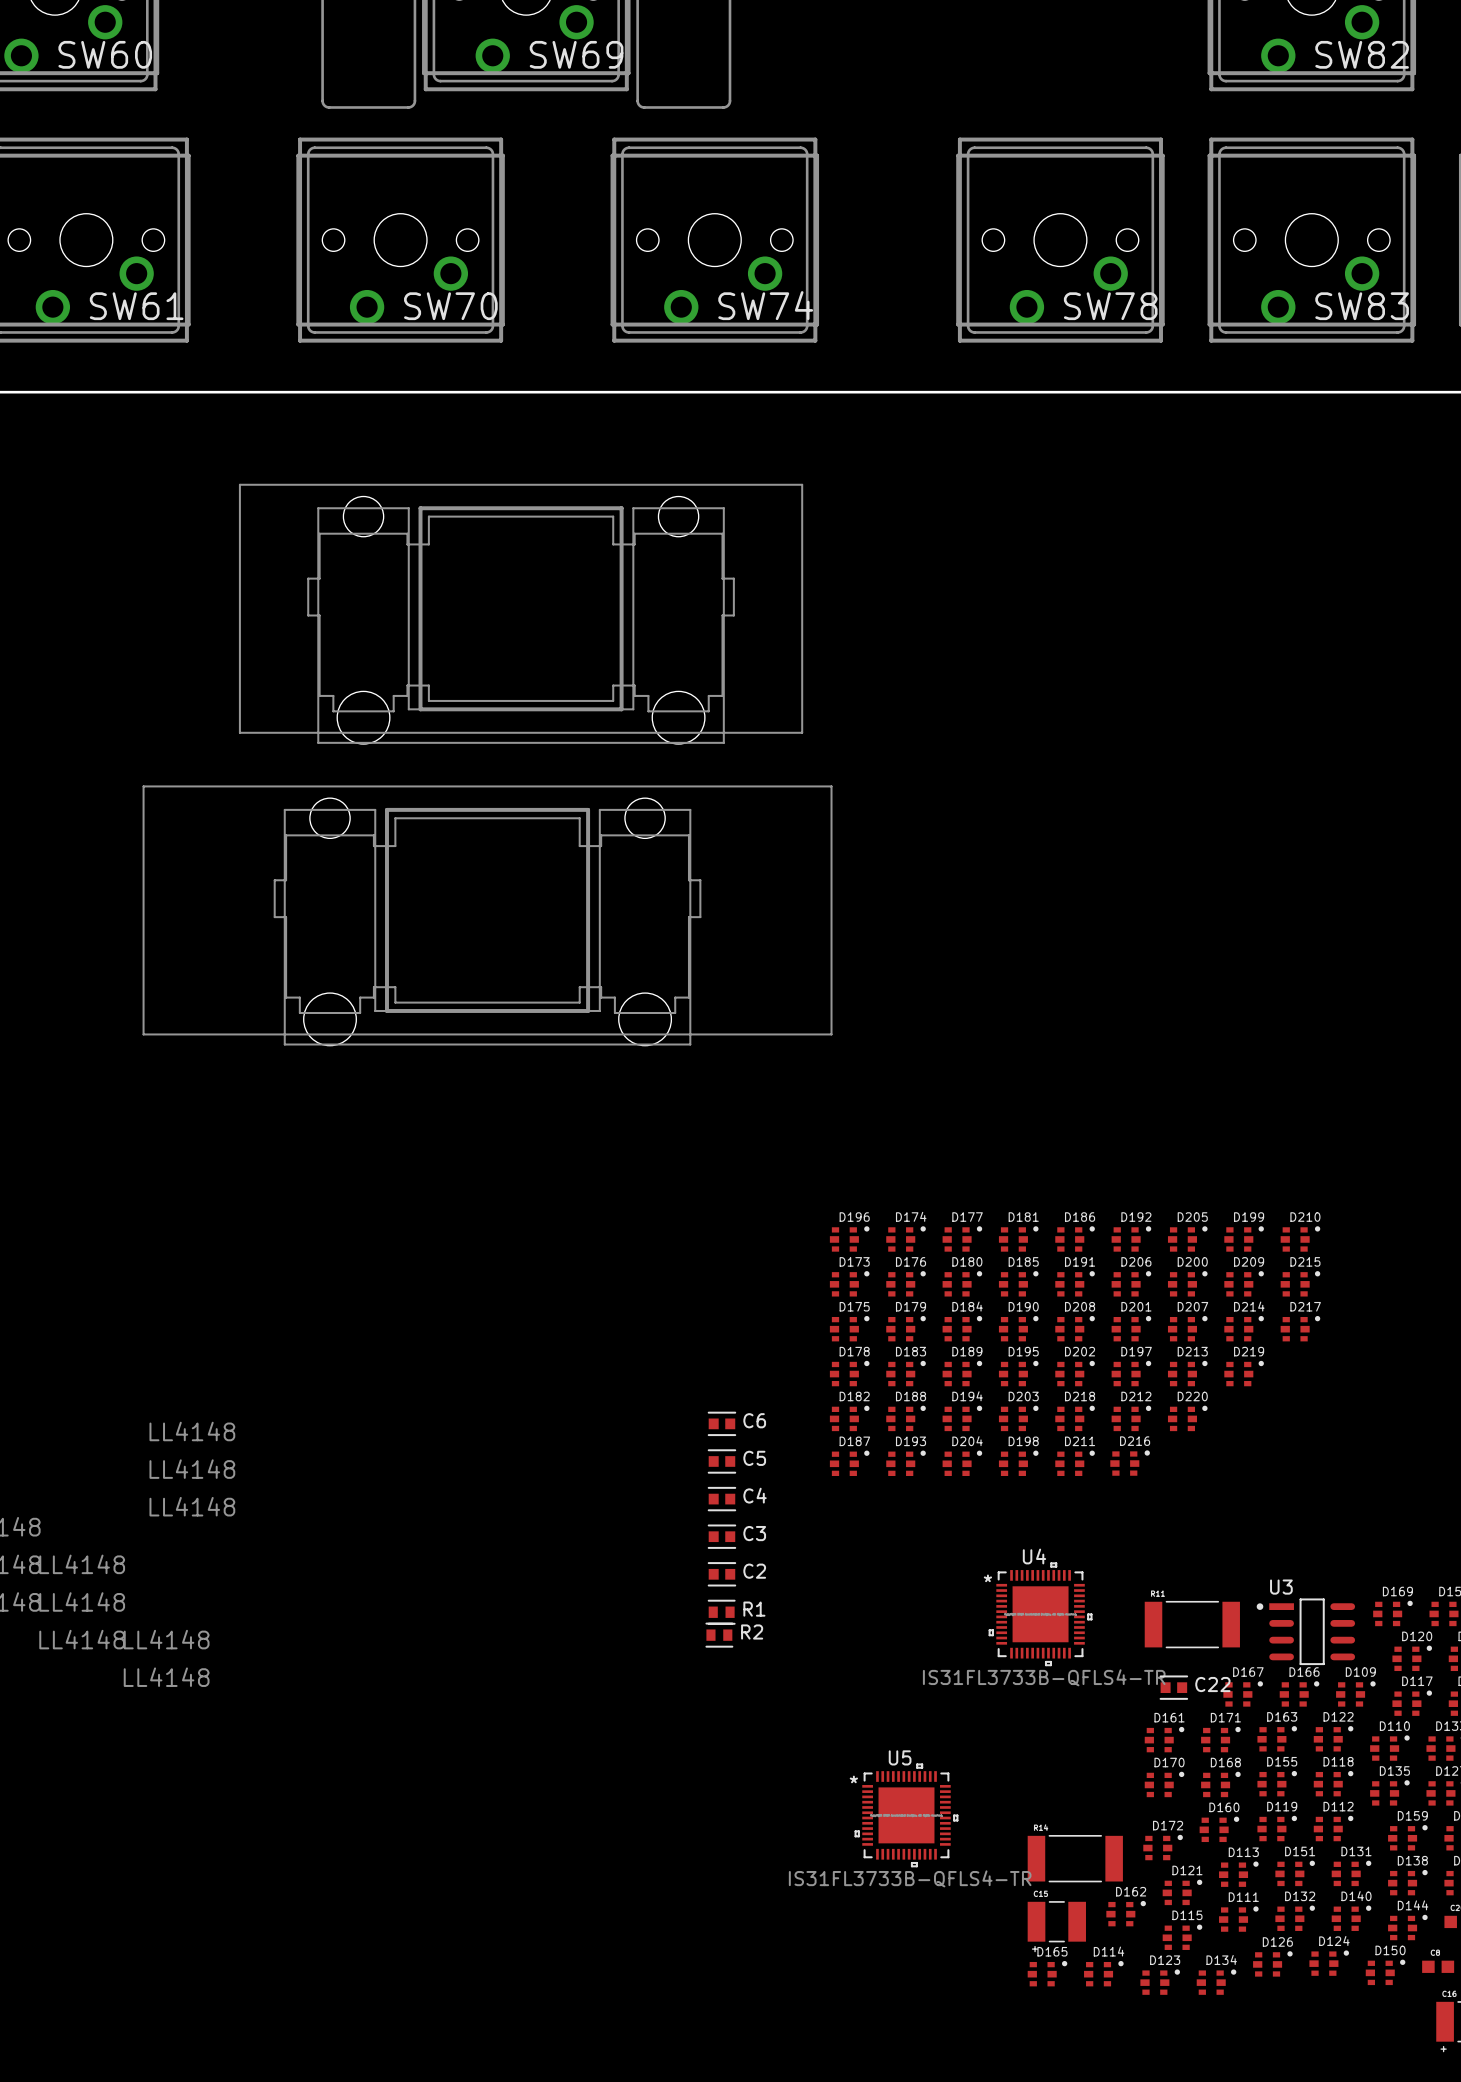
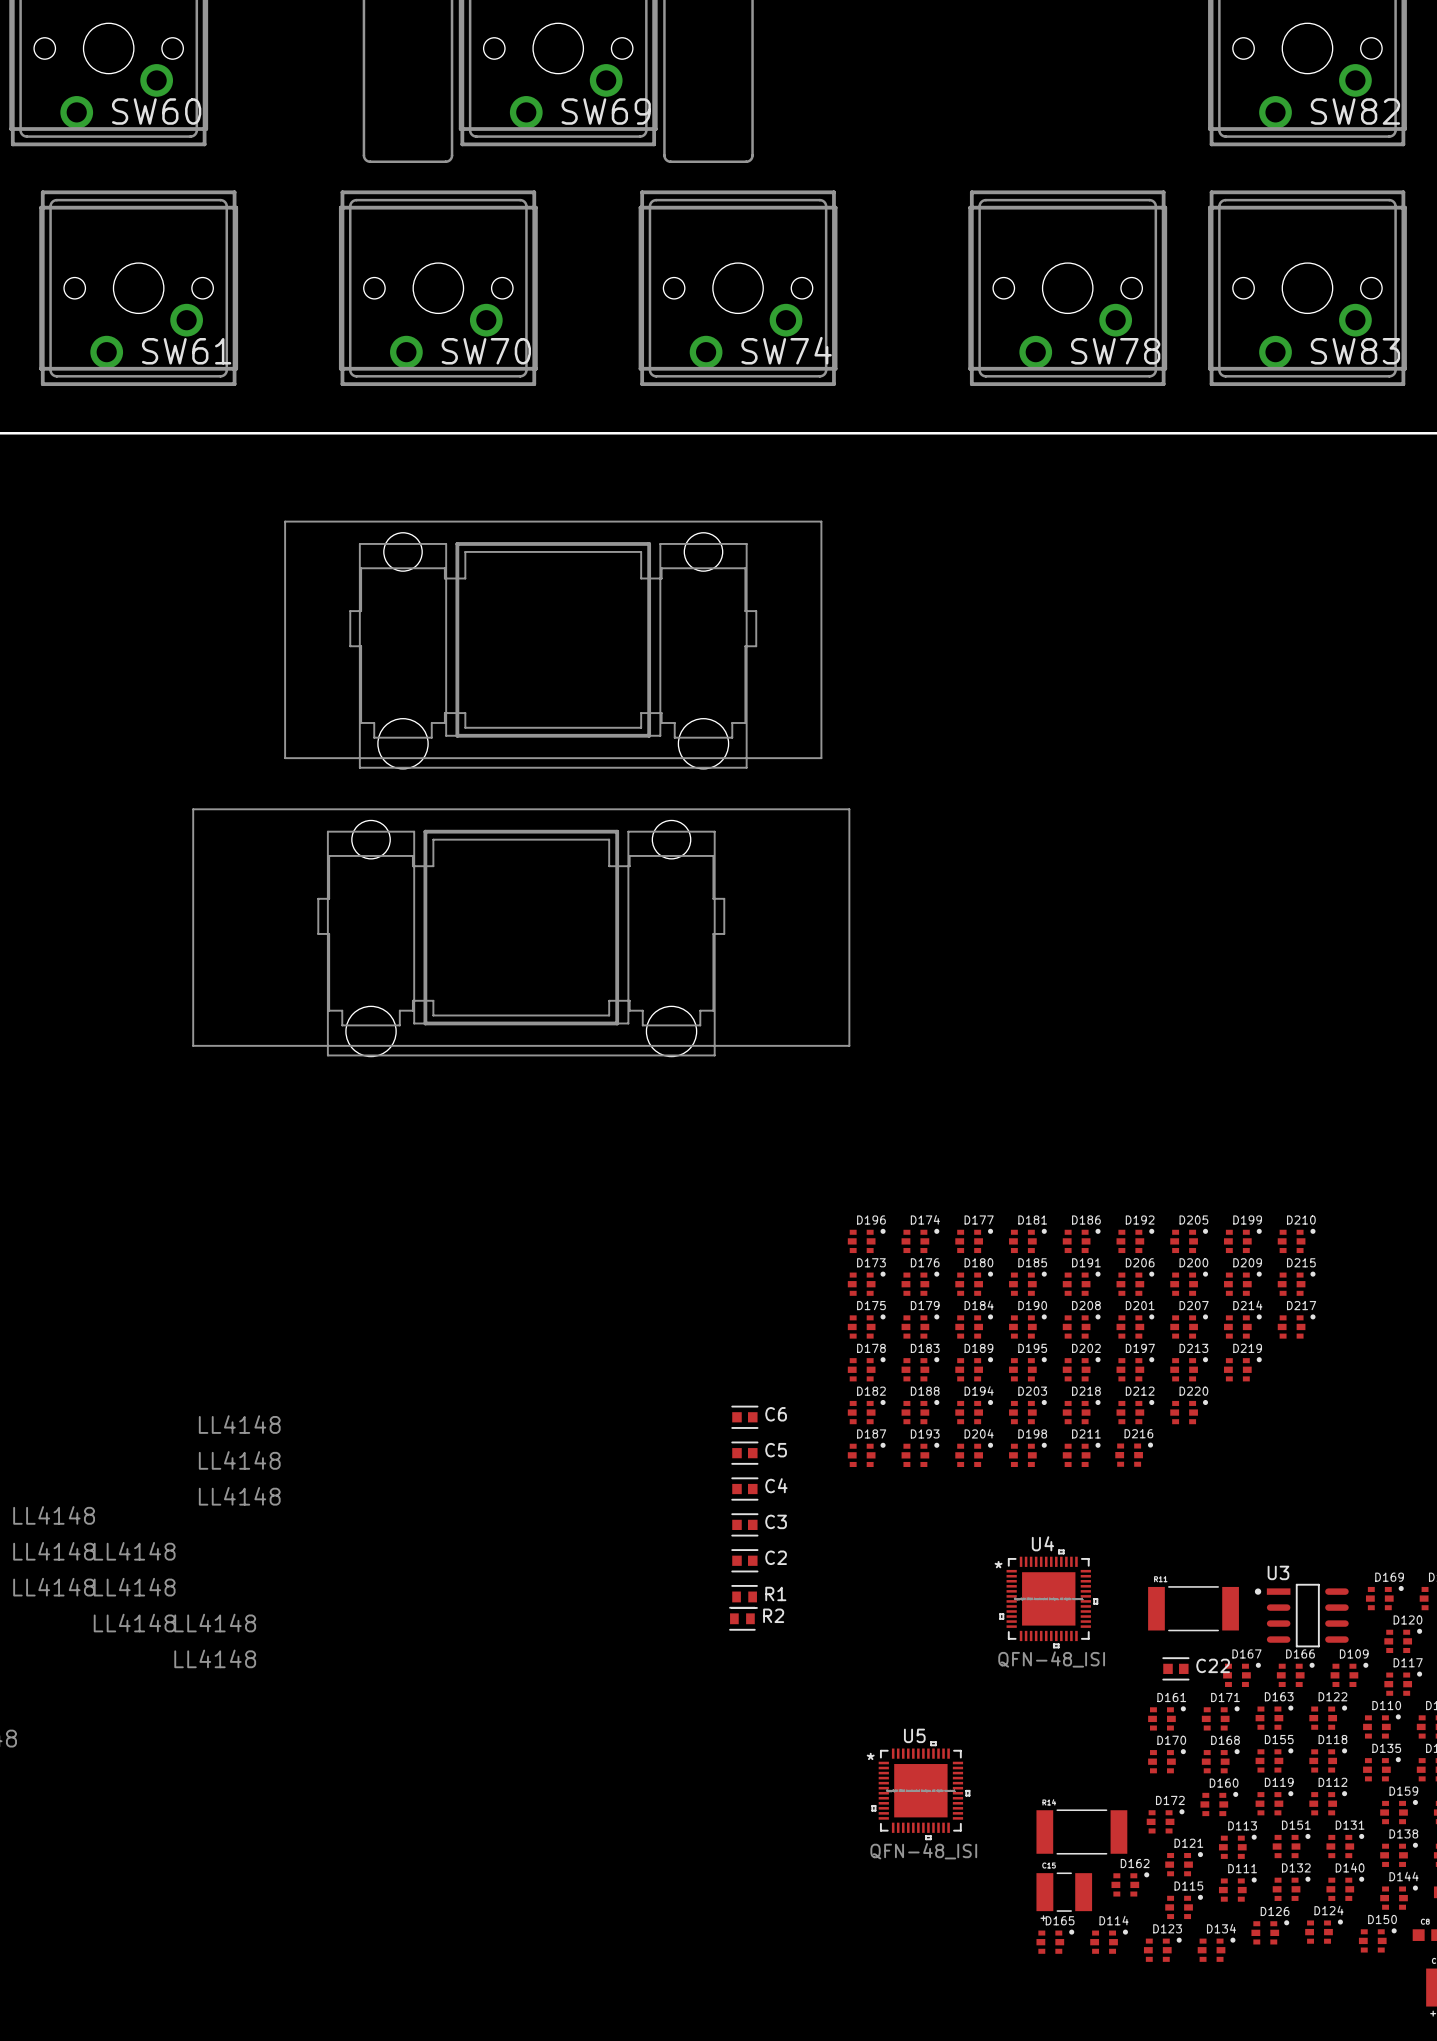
U4 value: IS31FL3733B-QFLS4-TR (1044, 1677) -> QFN-48_ISI (1051, 1659)
U5 value: IS31FL3733B-QFLS4-TR (910, 1878) -> QFN-48_ISI (923, 1851)

